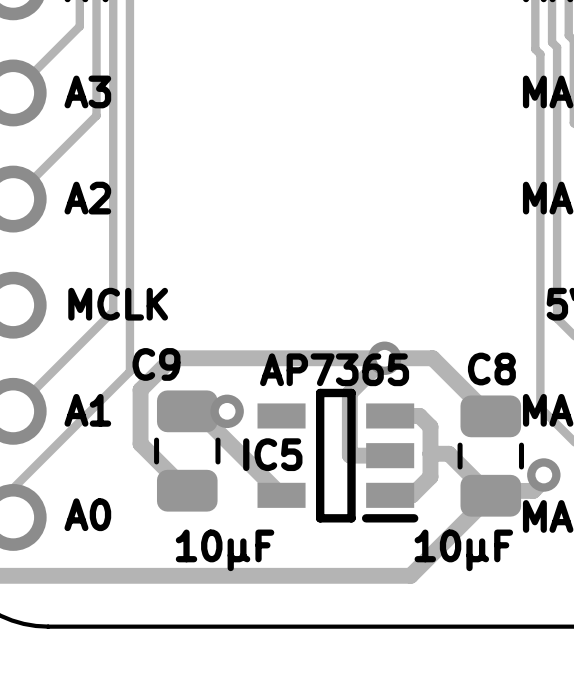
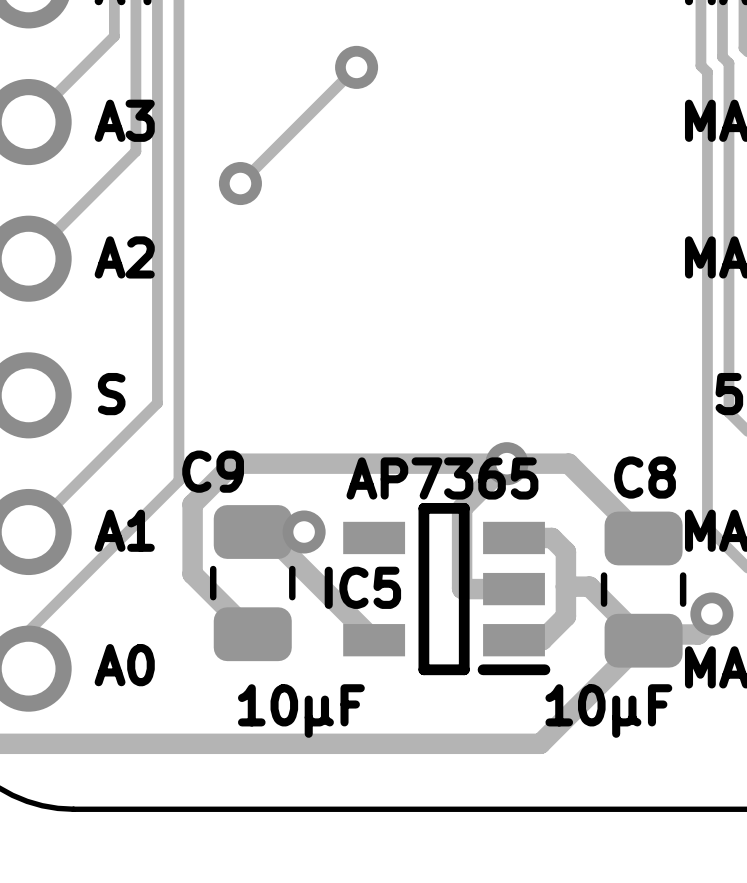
track: none -> (356, 67) (240, 183)
via: none -> (356, 67)
via: none -> (240, 183)
text: MCLK (118, 304) -> S (111, 394)

